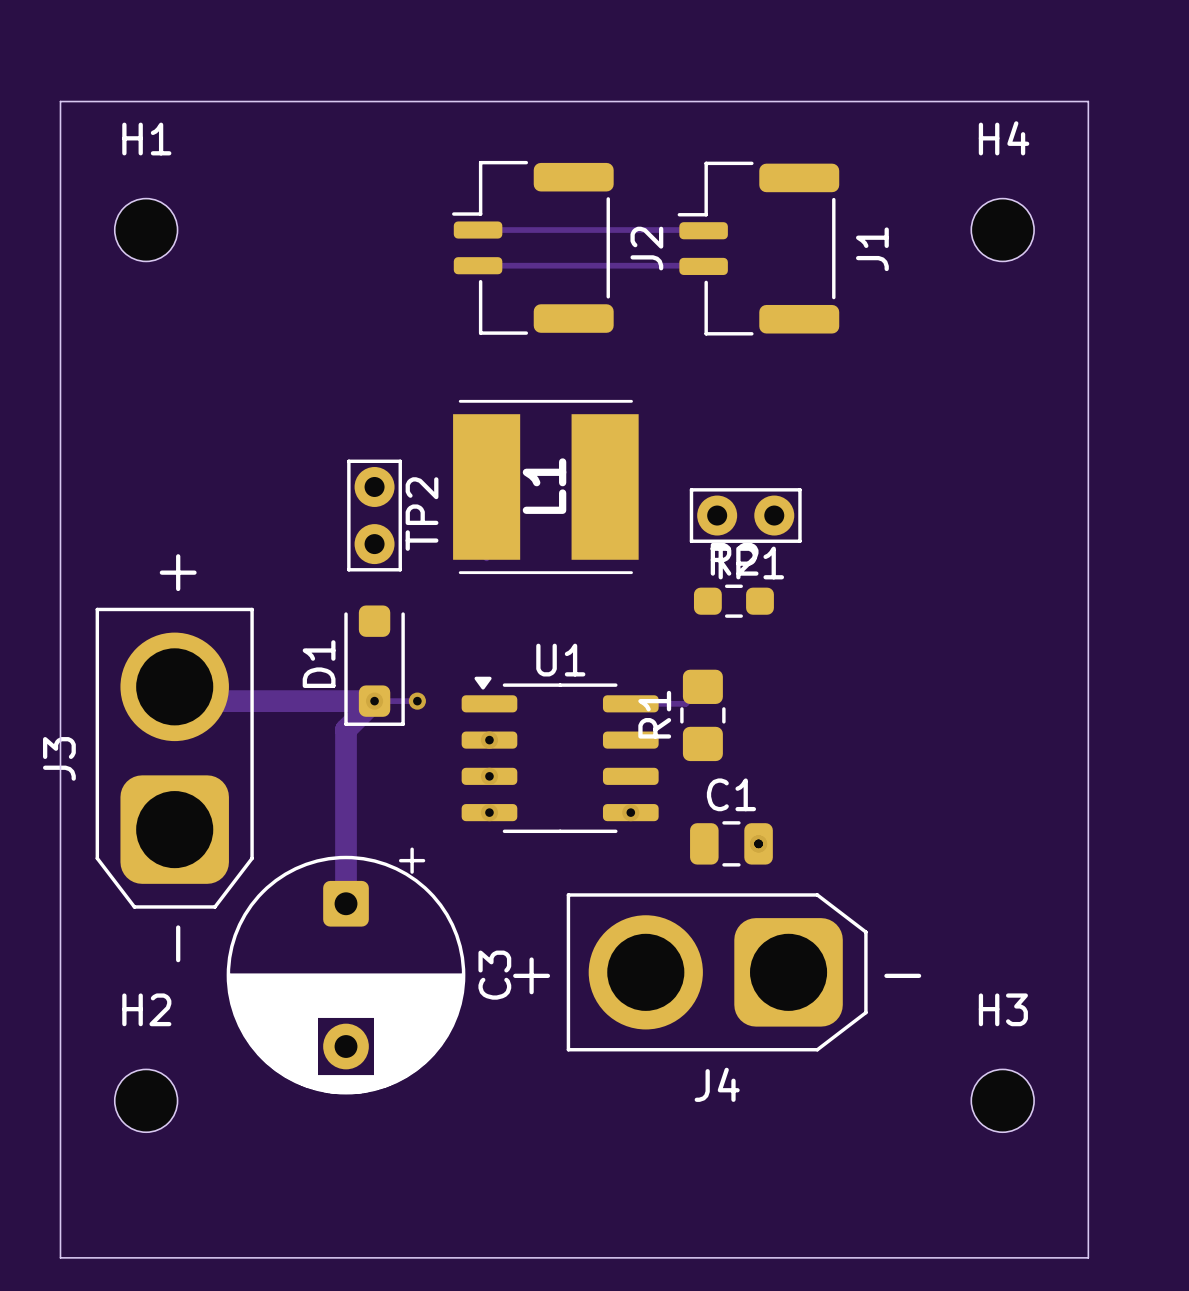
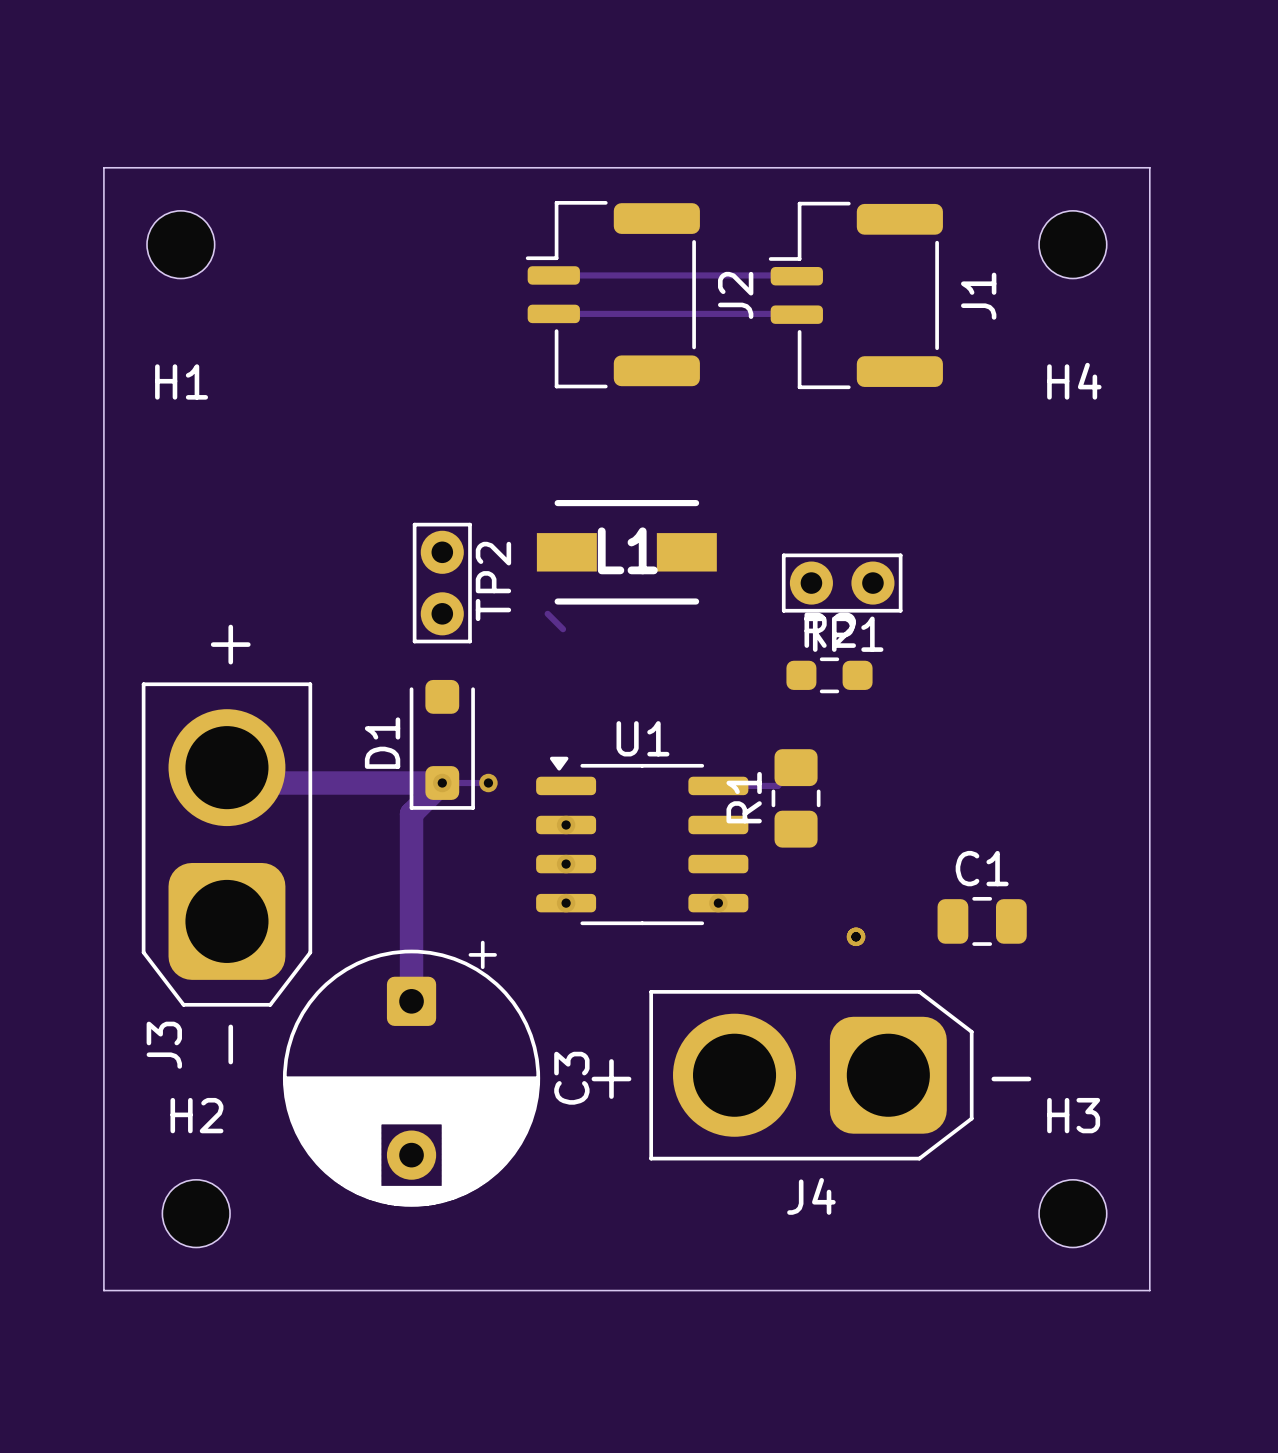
board edge: (60, 130) (60, 101) (1088, 101) (1088, 1257) (60, 1257) (60, 1172) -> (103, 167) (1149, 167) (1149, 1290) (103, 1290)
H4 name position: H4 (1004, 138) -> H4 (1074, 381)
H1 name position: H1 (146, 139) -> H1 (181, 381)
H1 position: (146, 230) -> (180, 244)
H4 position: (1002, 230) -> (1072, 244)
L1 footprint: [453, 399, 639, 575] -> [536, 500, 717, 605]
J3 name position: J3 (59, 758) -> J3 (164, 1045)
C1 position: (731, 843) -> (982, 921)
H3 position: (1002, 1100) -> (1072, 1213)

